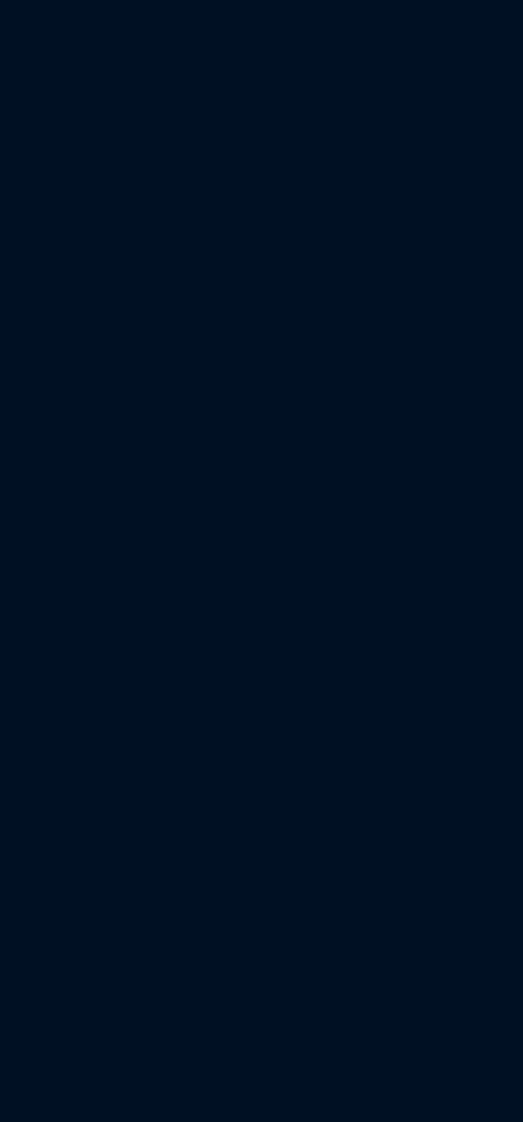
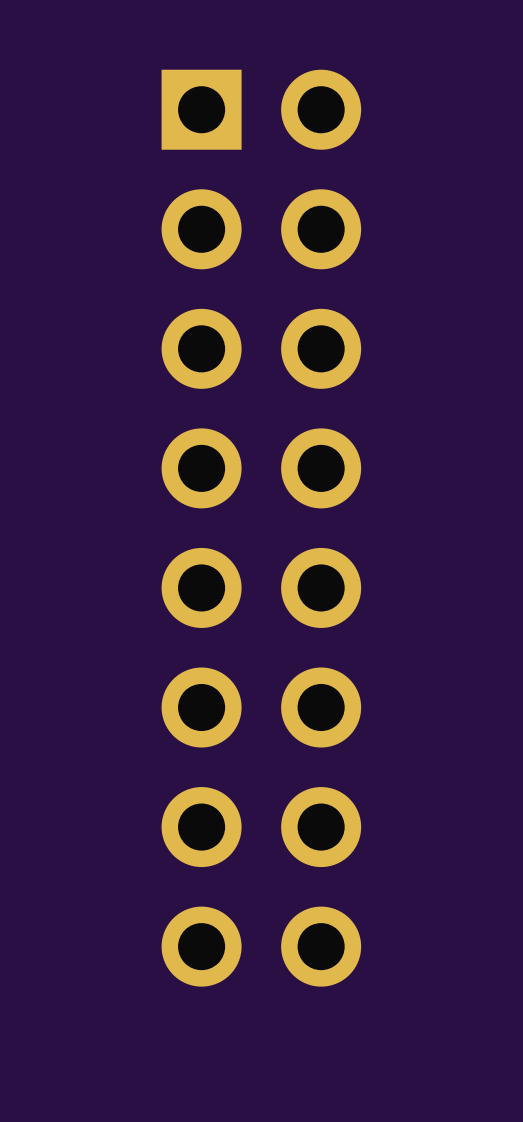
part: none -> (261, 528)

